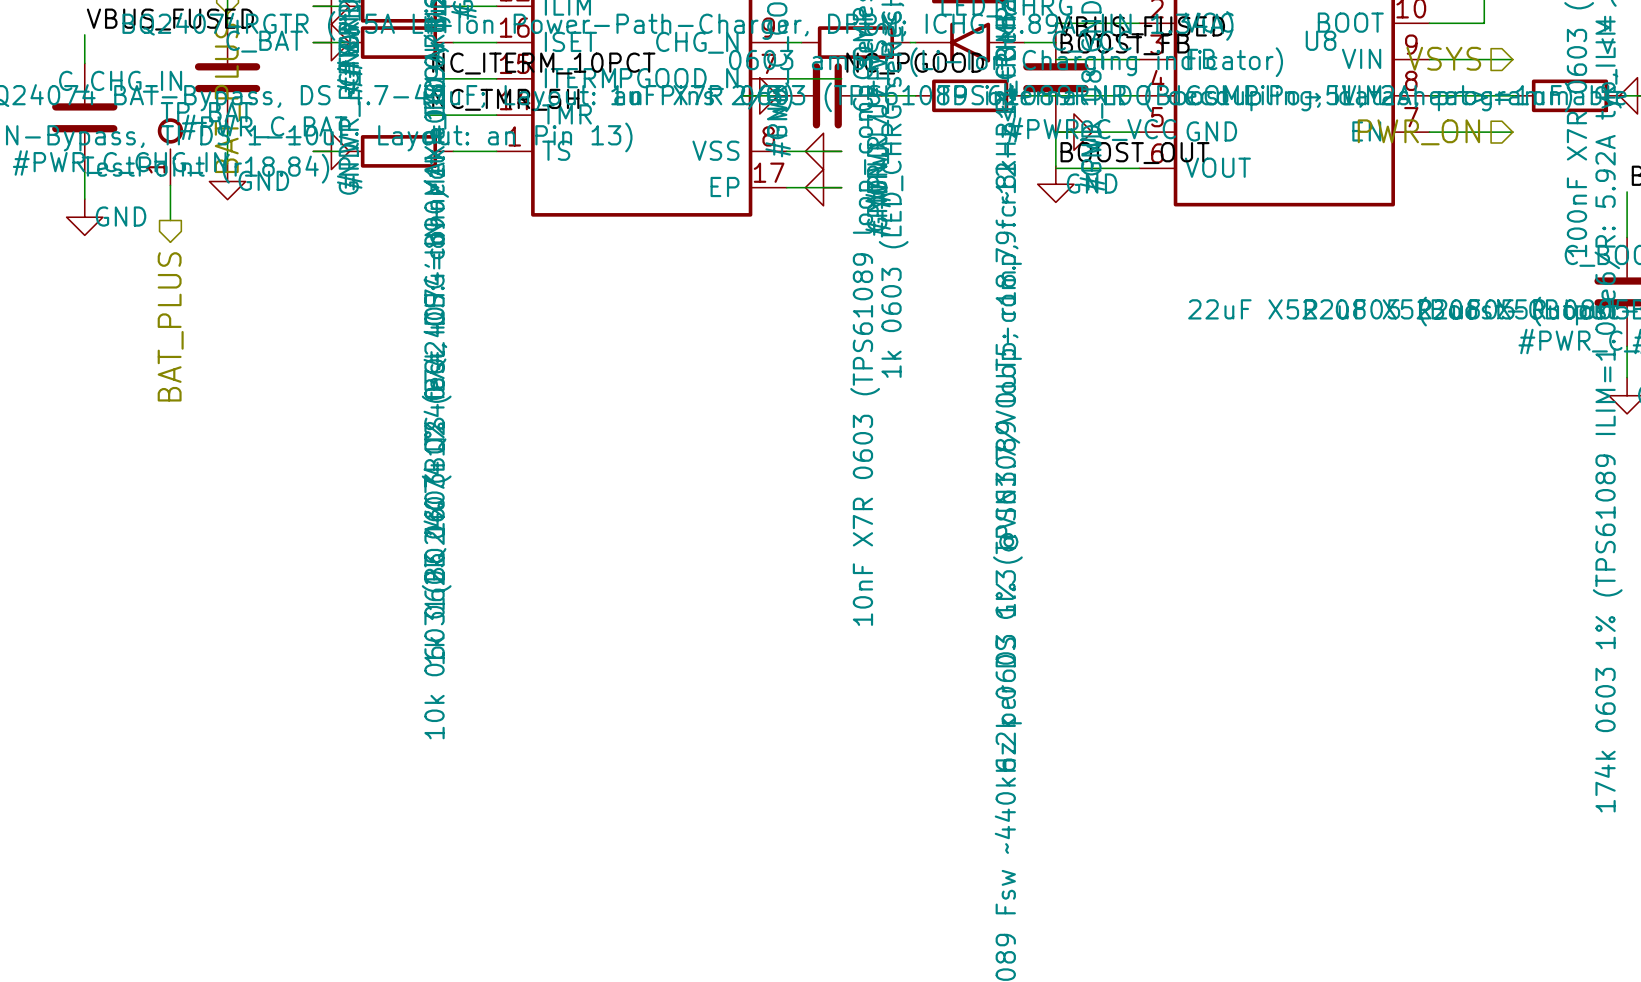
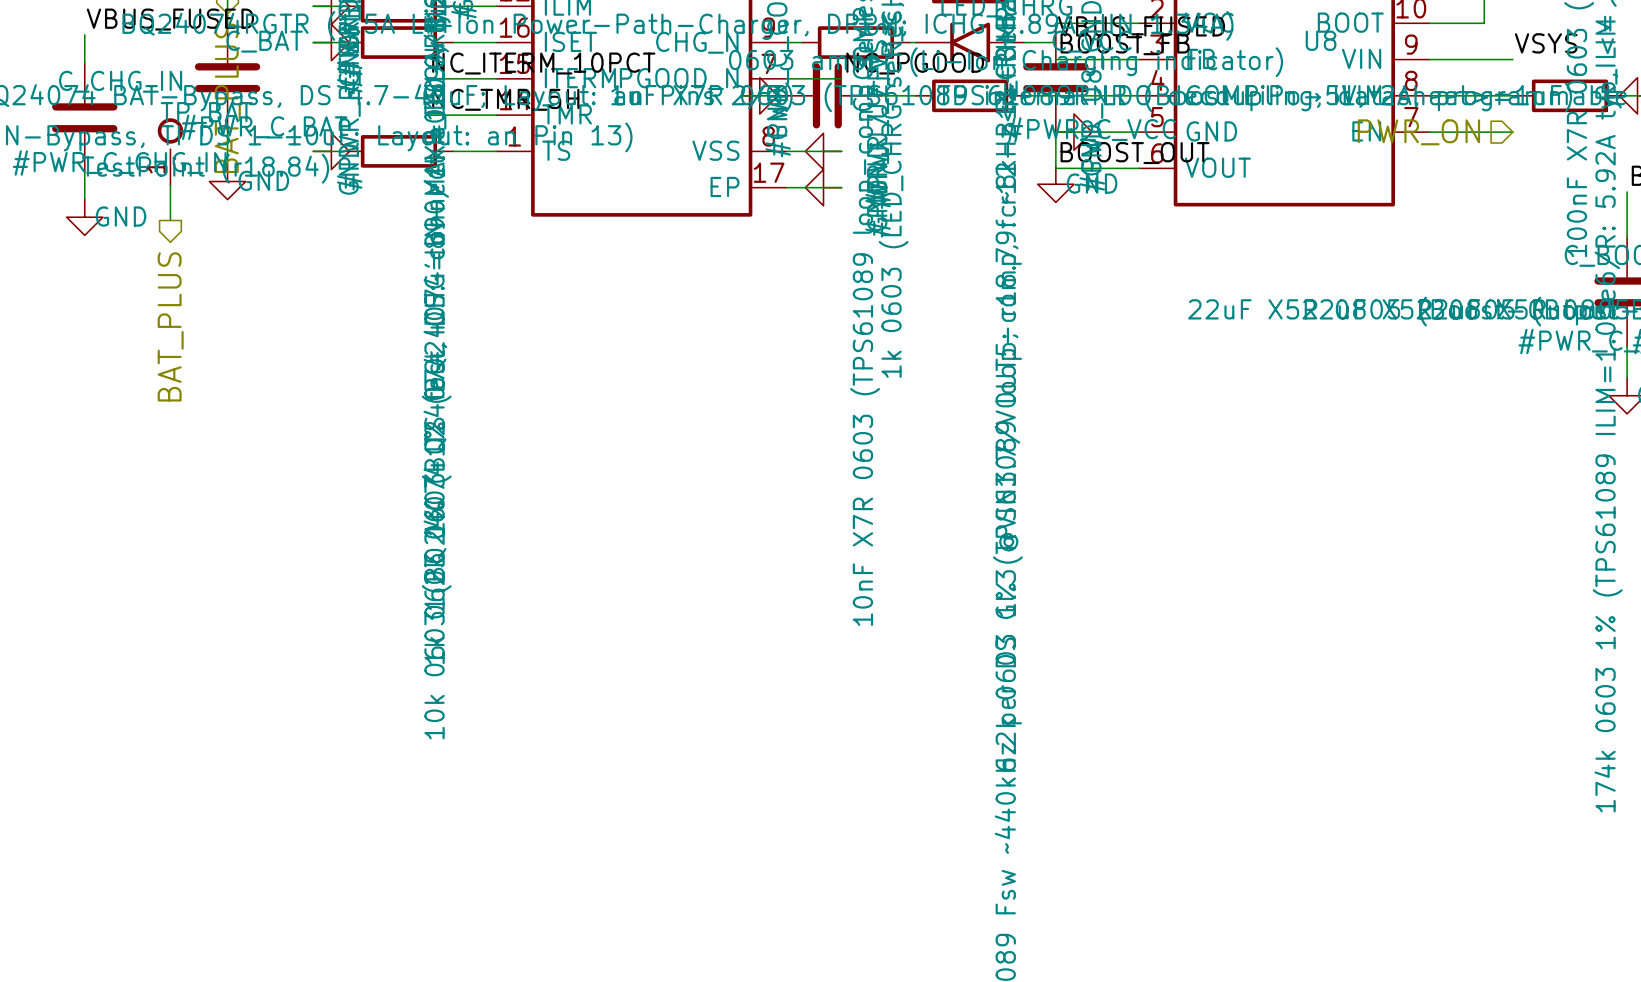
label: none -> VSYS (1546, 43)
hierarchical label: VSYS (1443, 58) -> none

